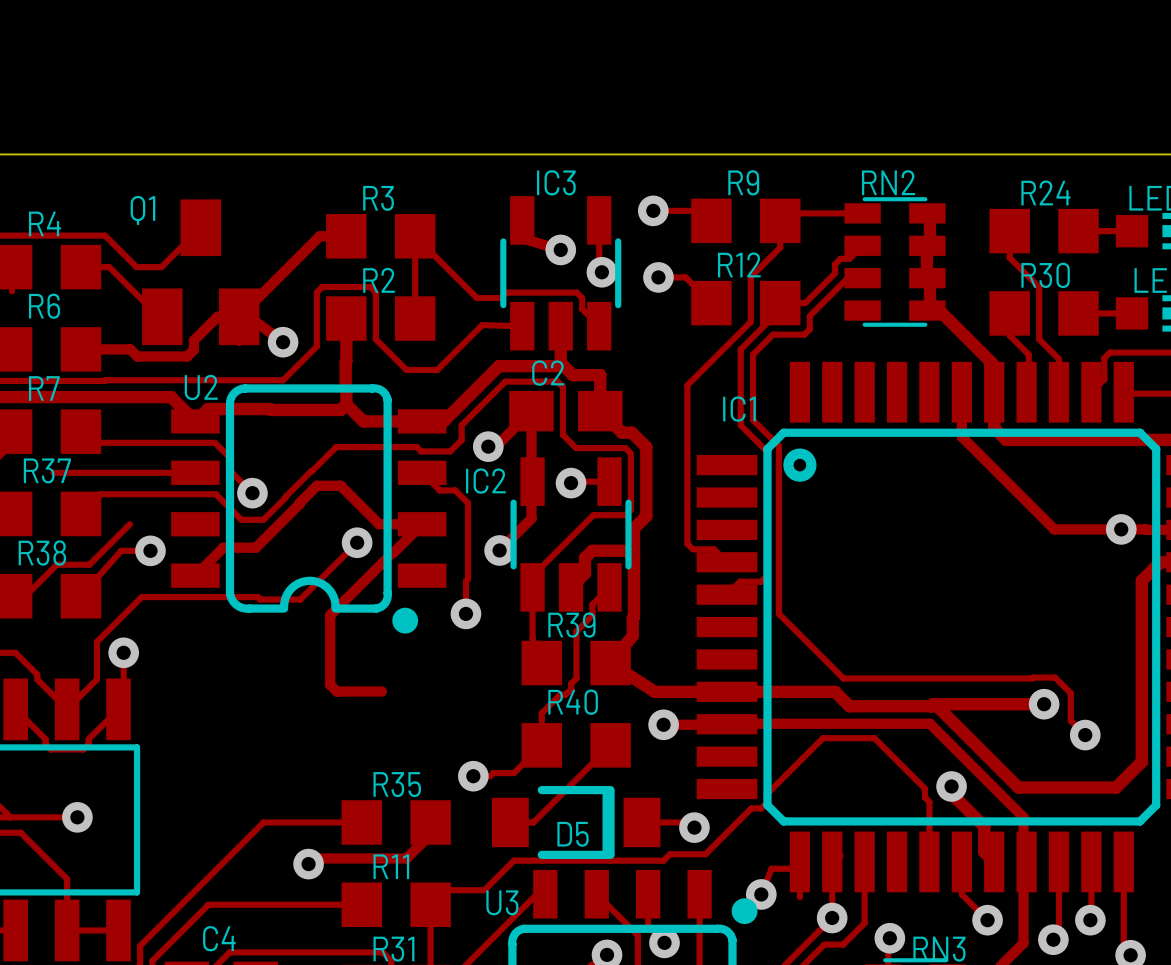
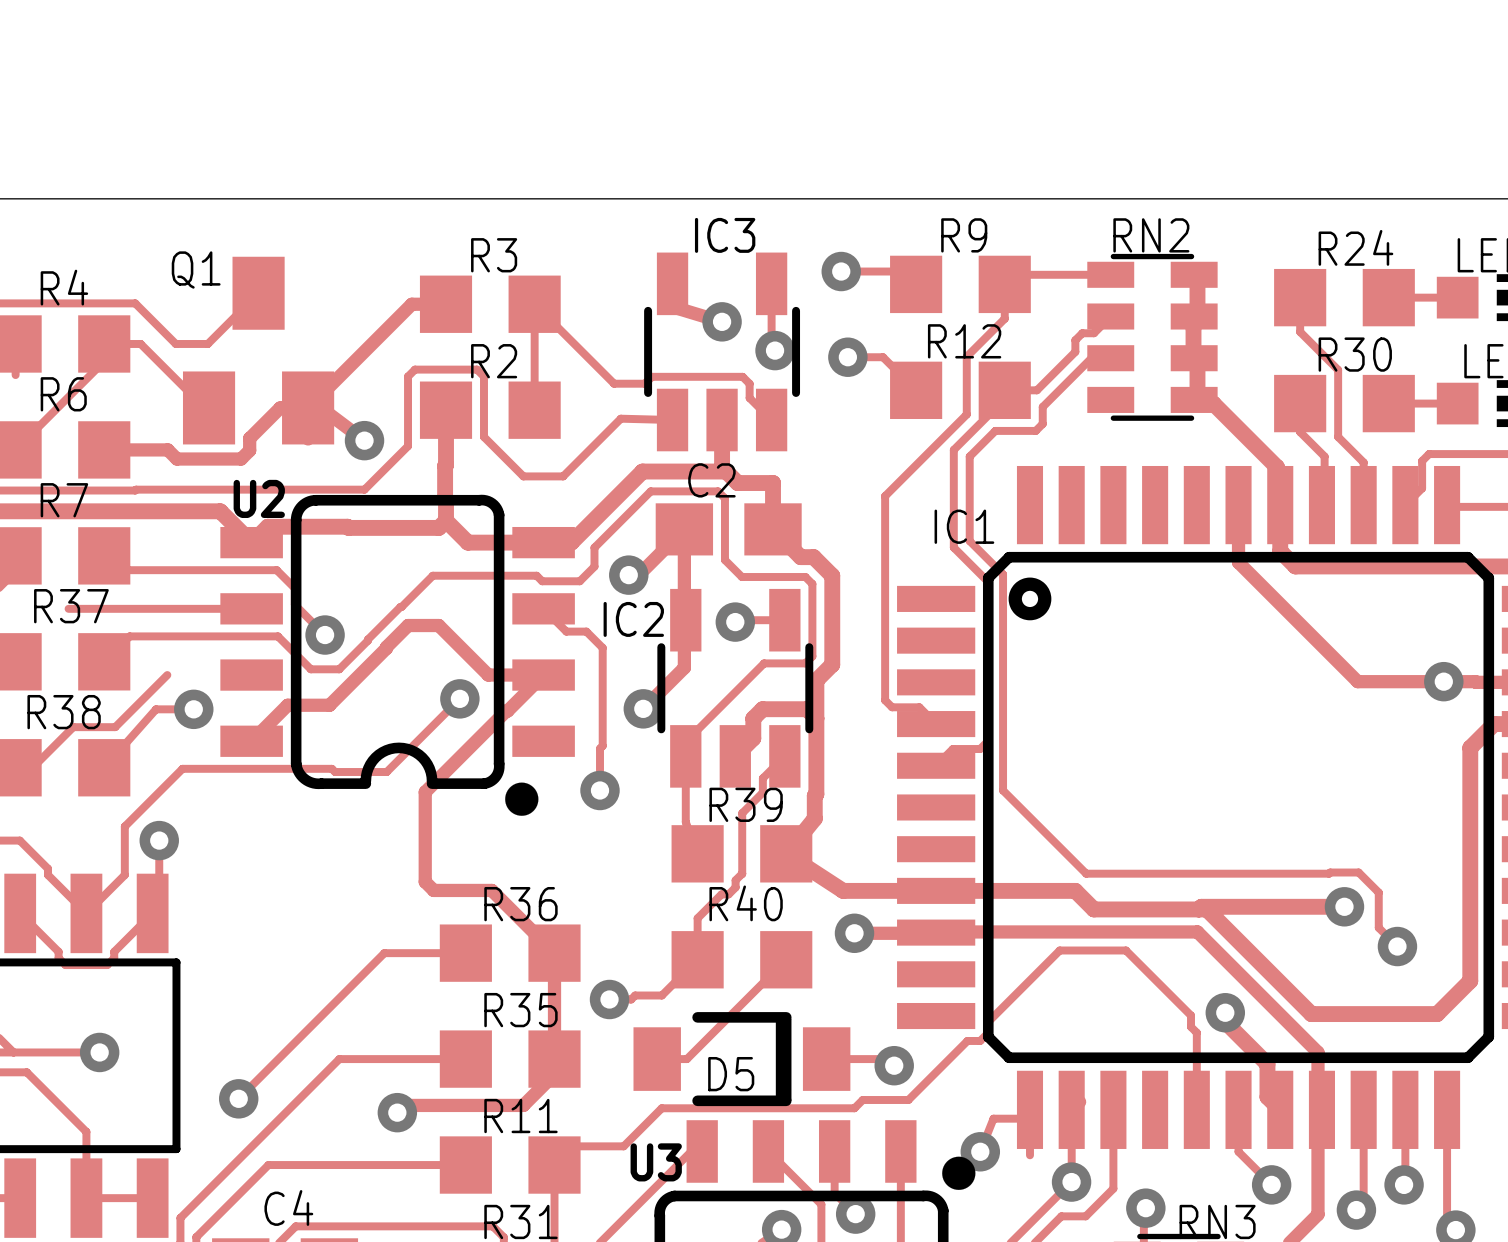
track: none -> (106, 359) (15, 449)
track: none -> (491, 890) (554, 953) (554, 1059)
track: none -> (465, 953) (384, 953) (238, 1098)
R36: none -> (510, 953)
via: none -> (238, 1098)

